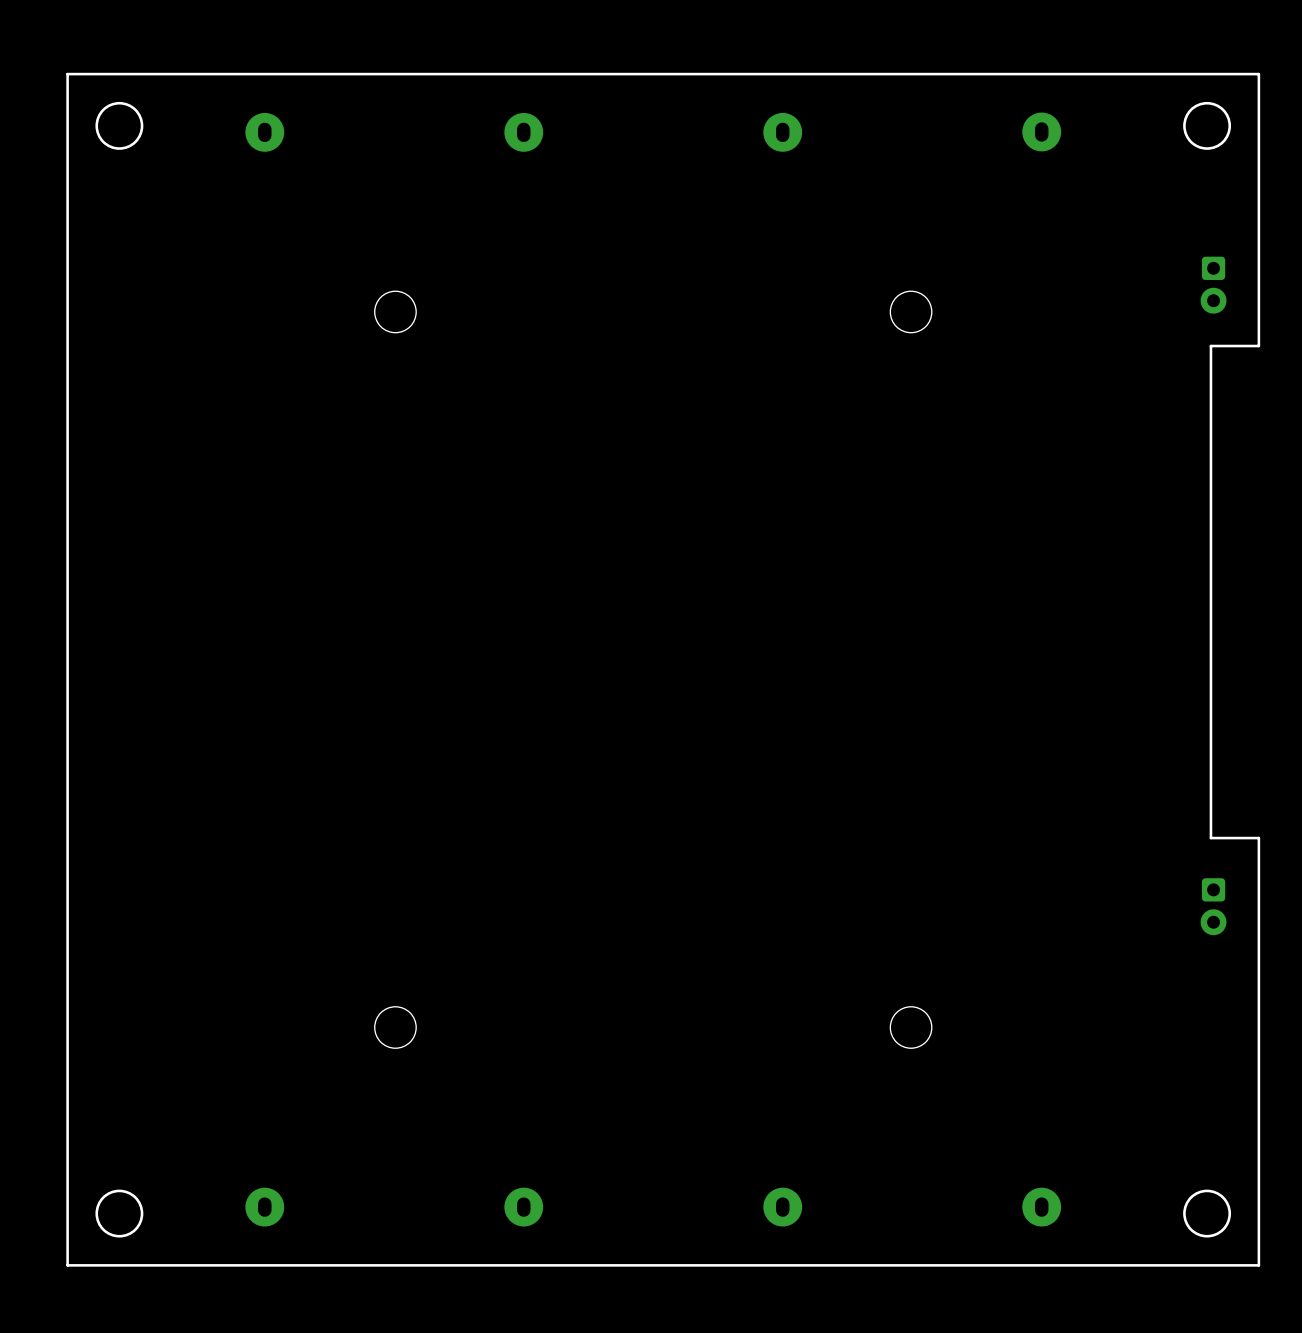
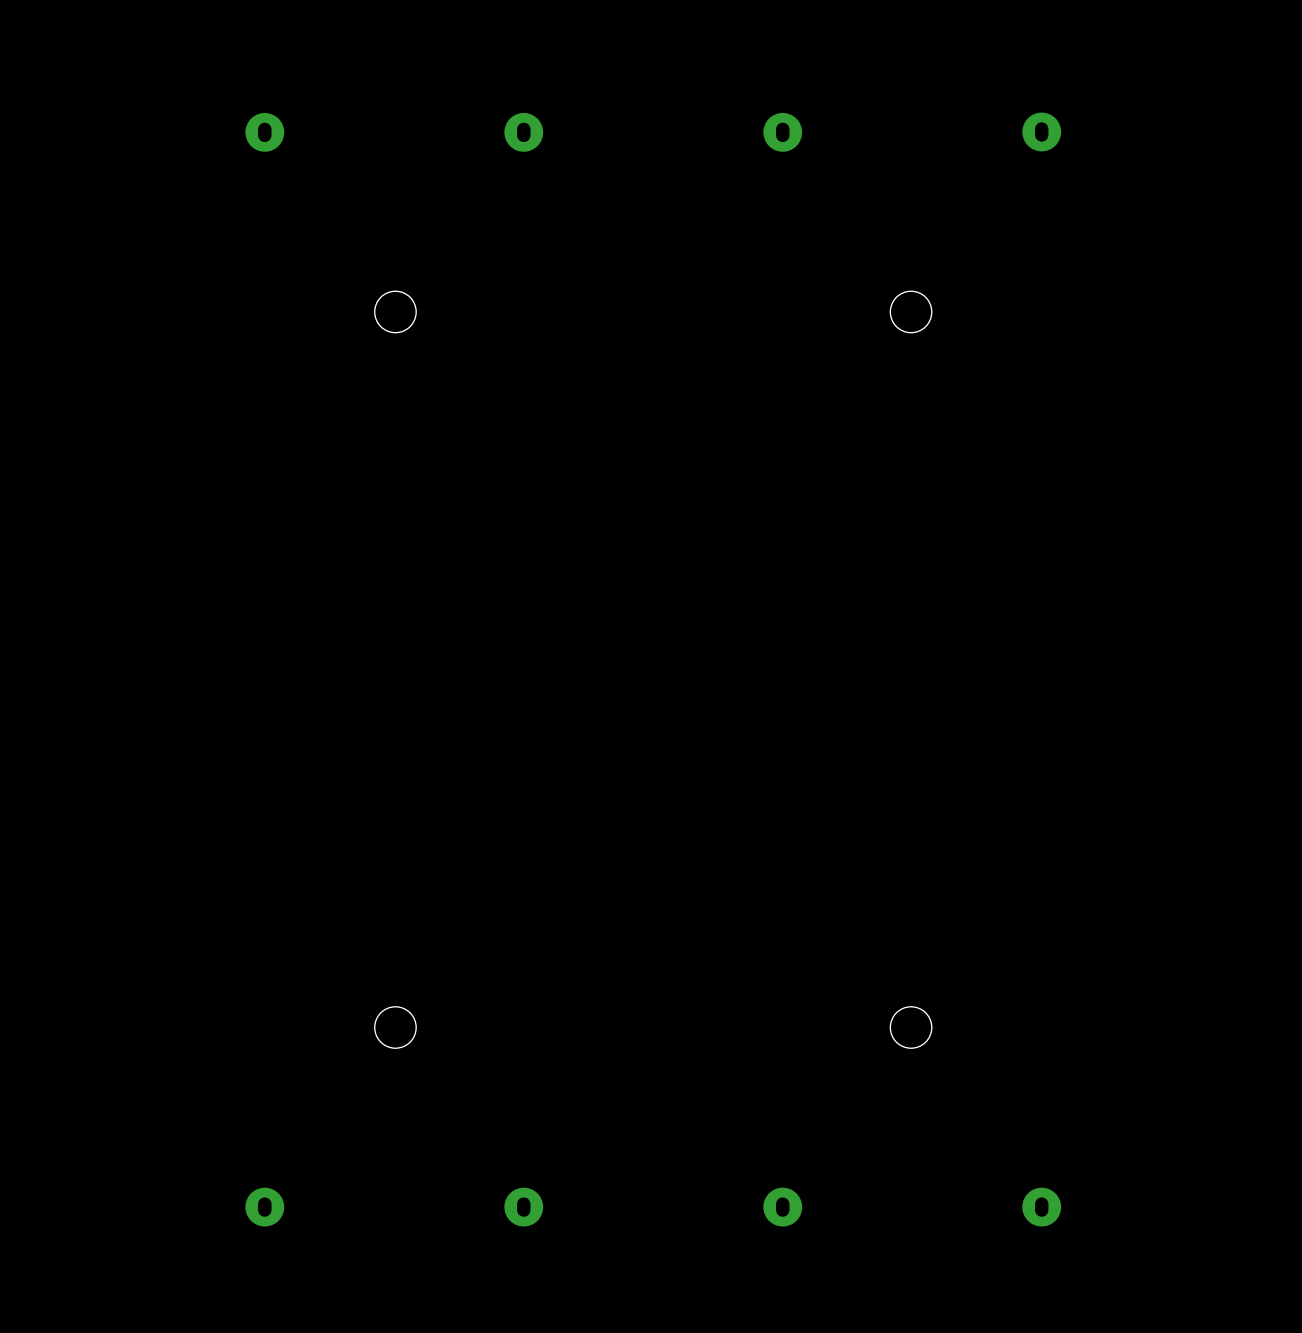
board edge: (1258, 74) (67, 74) (67, 1265) (1258, 1265) (1258, 838) (1210, 838) (1210, 346) (1258, 346) (1258, 74) -> none
round board edge: [95, 101, 144, 150] -> none
round board edge: [1183, 101, 1232, 150] -> none
part: (1213, 285) -> none
part: (1213, 906) -> none
round board edge: [95, 1189, 144, 1238] -> none
round board edge: [1183, 1189, 1232, 1238] -> none

